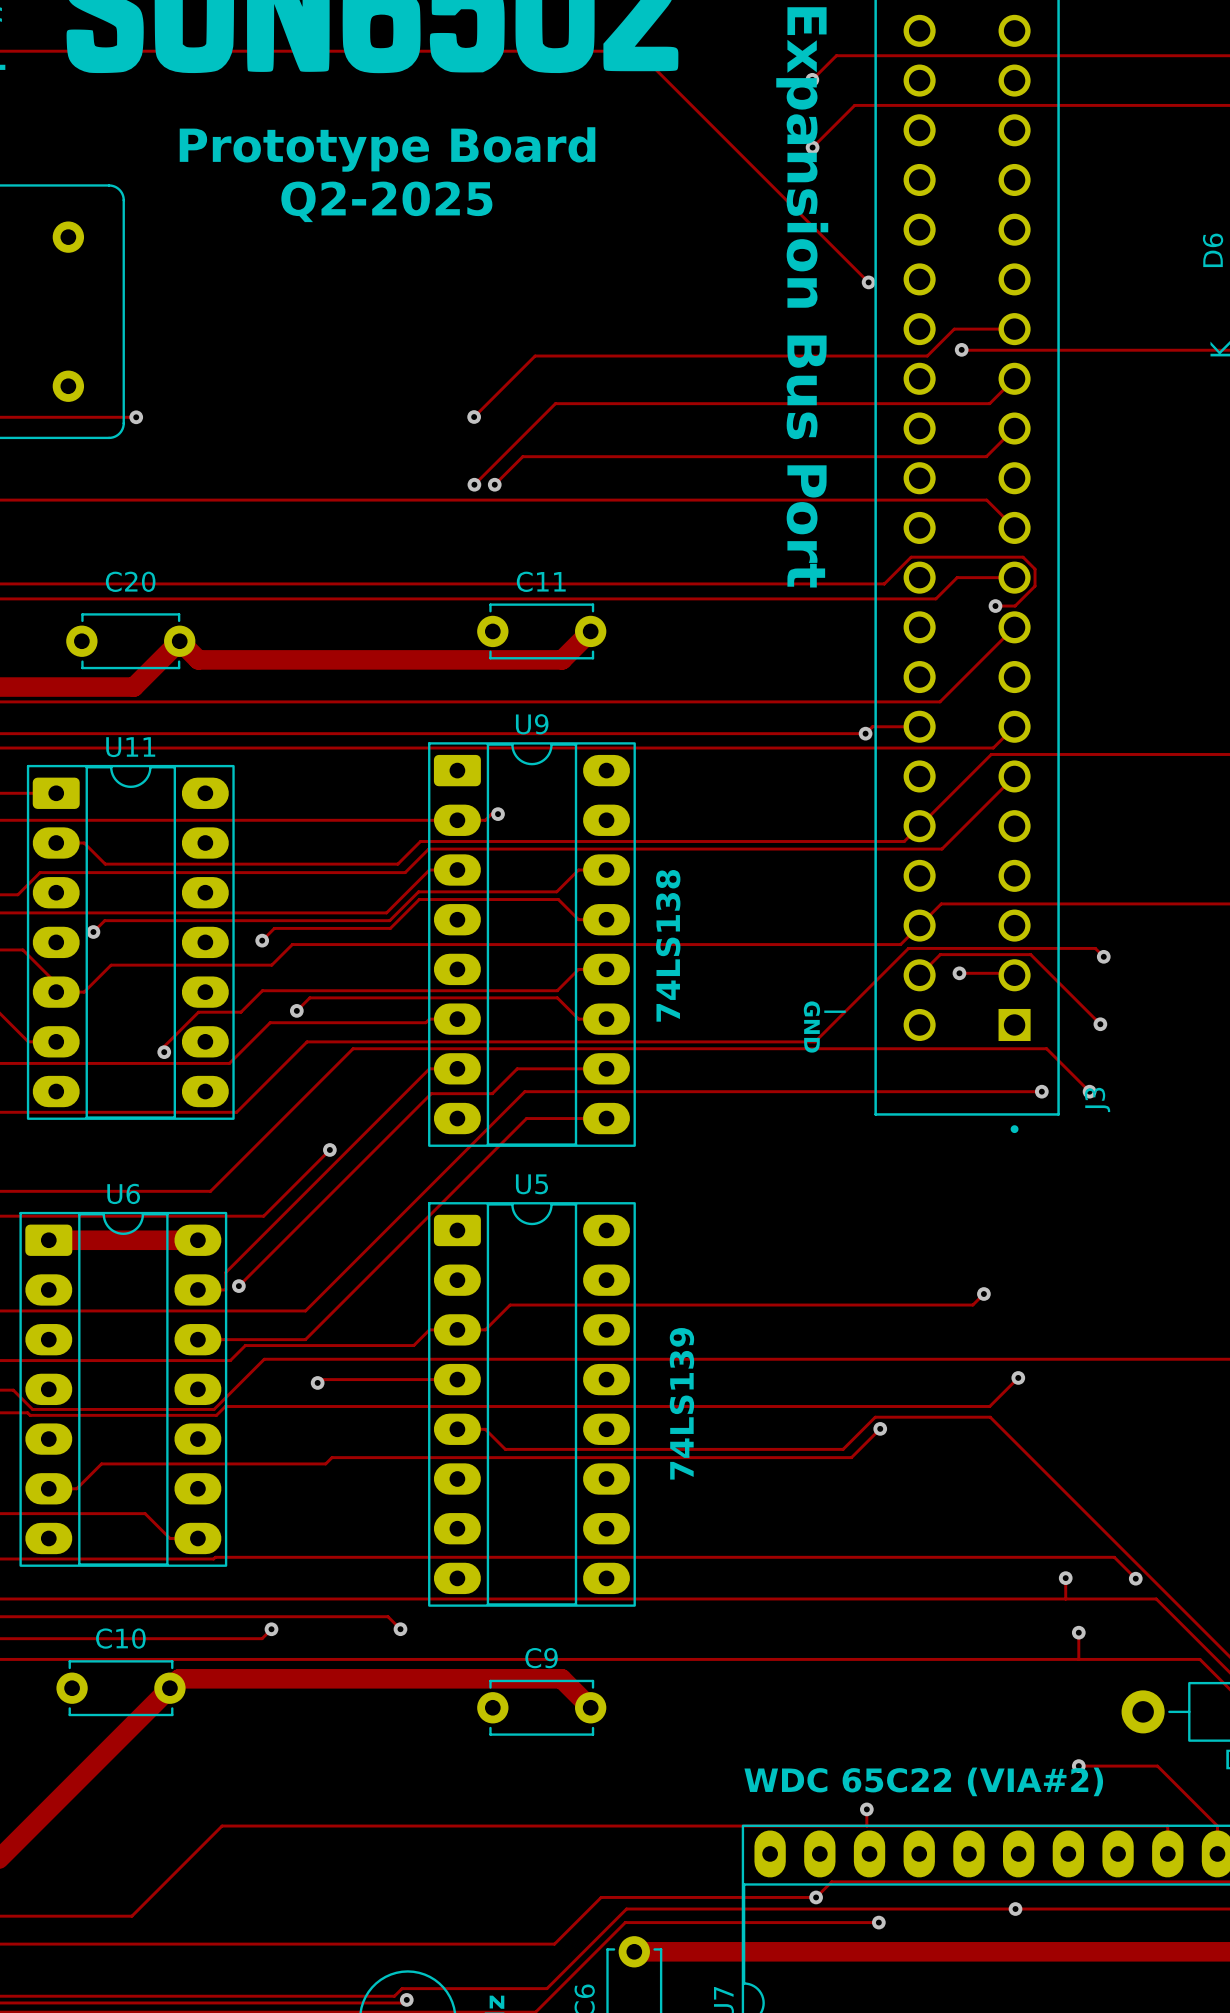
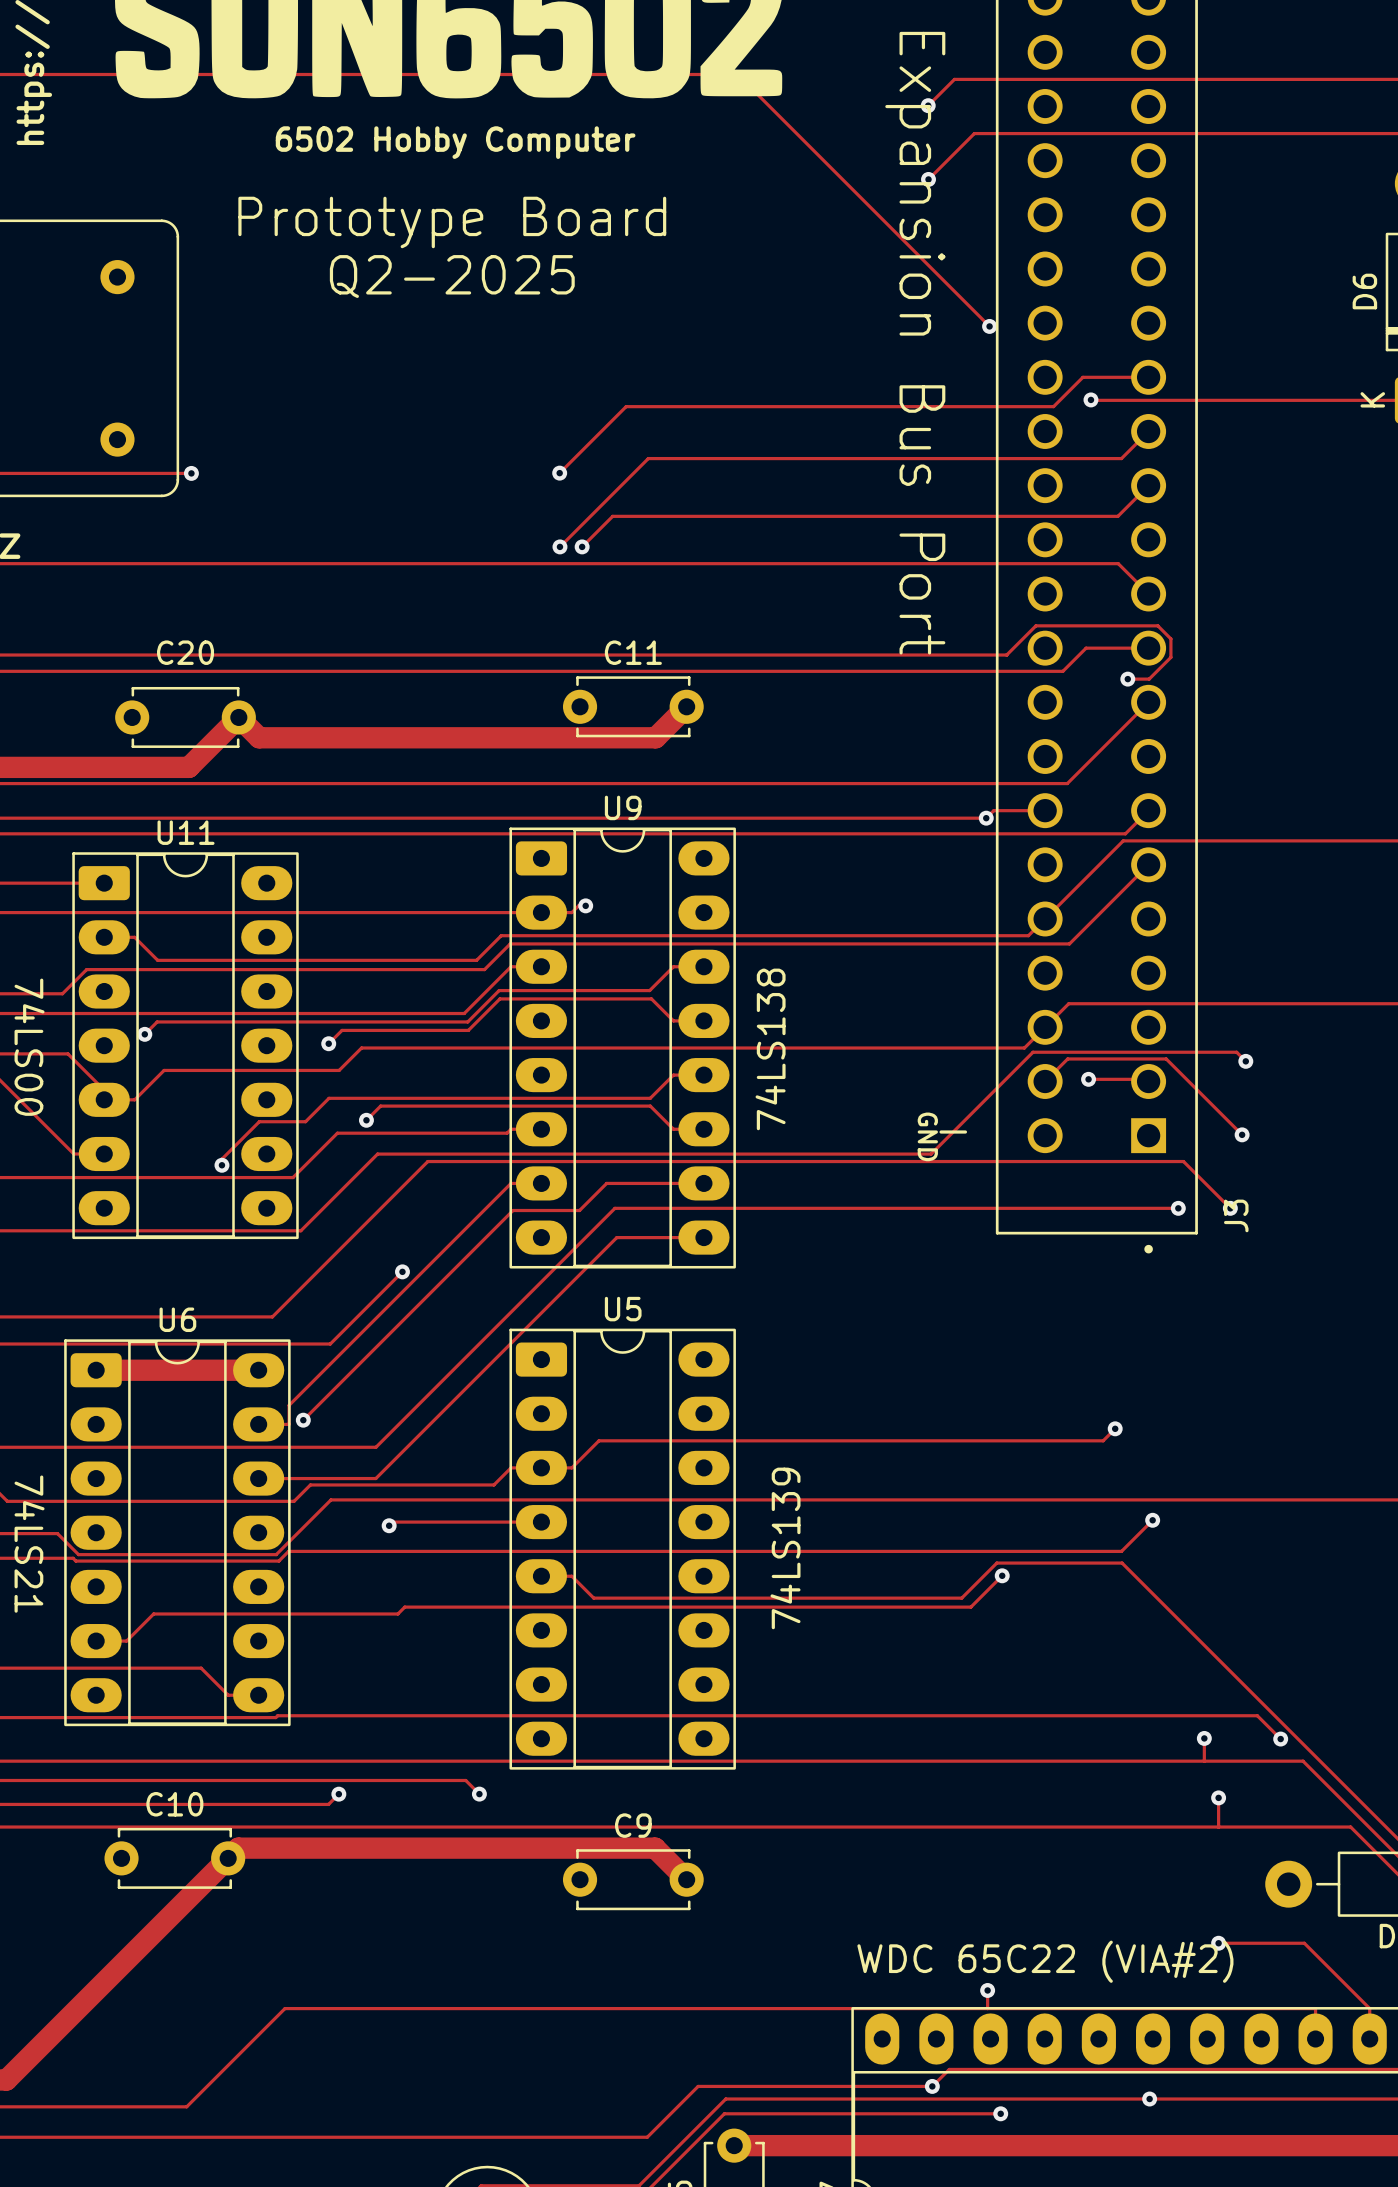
text: none -> 6502 Hobby Computer (455, 142)
text position: Prototype Board (387, 149) -> Prototype Board (452, 222)
text position: Q2-2025 (386, 201) -> Q2-2025 (452, 276)

